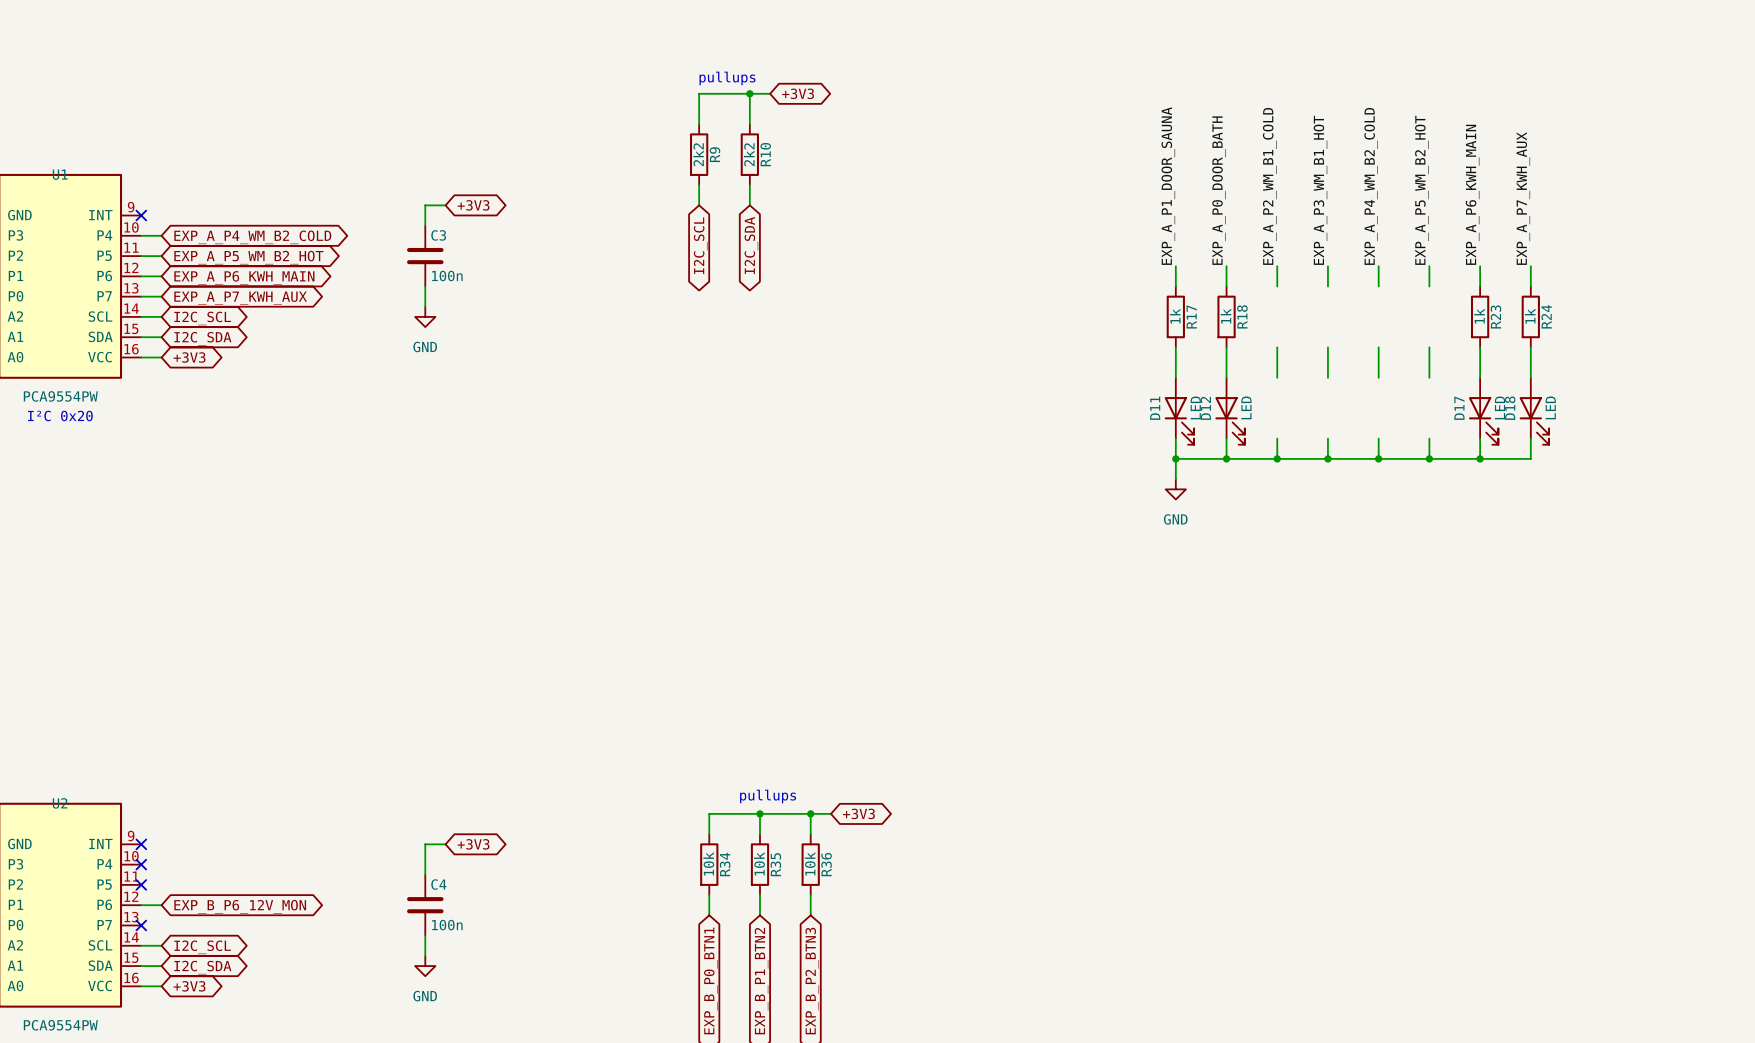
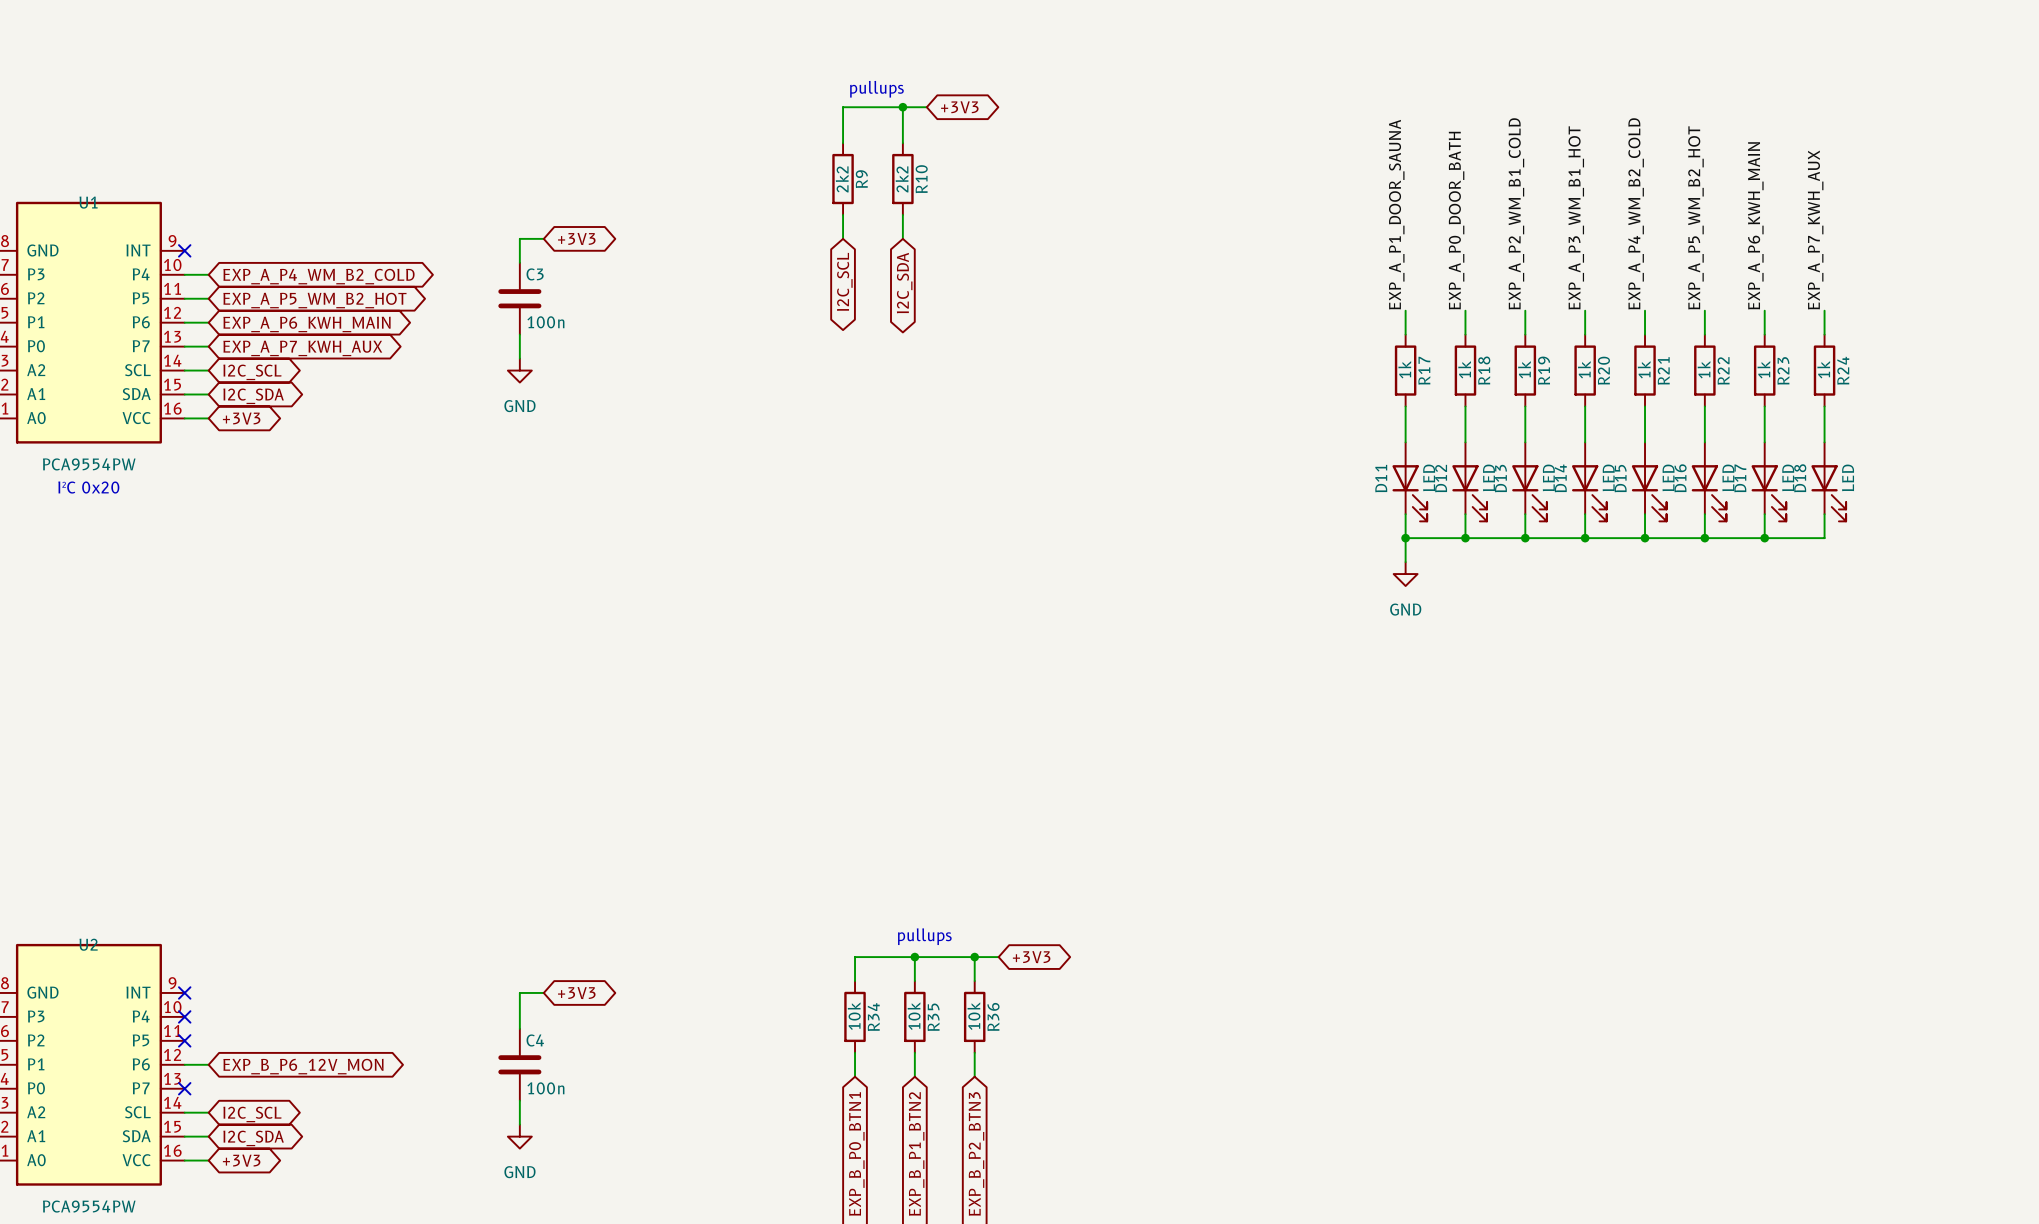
R19: none -> 1k (1525, 370)
R20: none -> 1k (1585, 370)
R21: none -> 1k (1645, 370)
R22: none -> 1k (1704, 370)
D13: none -> LED (1529, 481)
D14: none -> LED (1589, 481)
D15: none -> LED (1649, 481)
D16: none -> LED (1709, 481)

